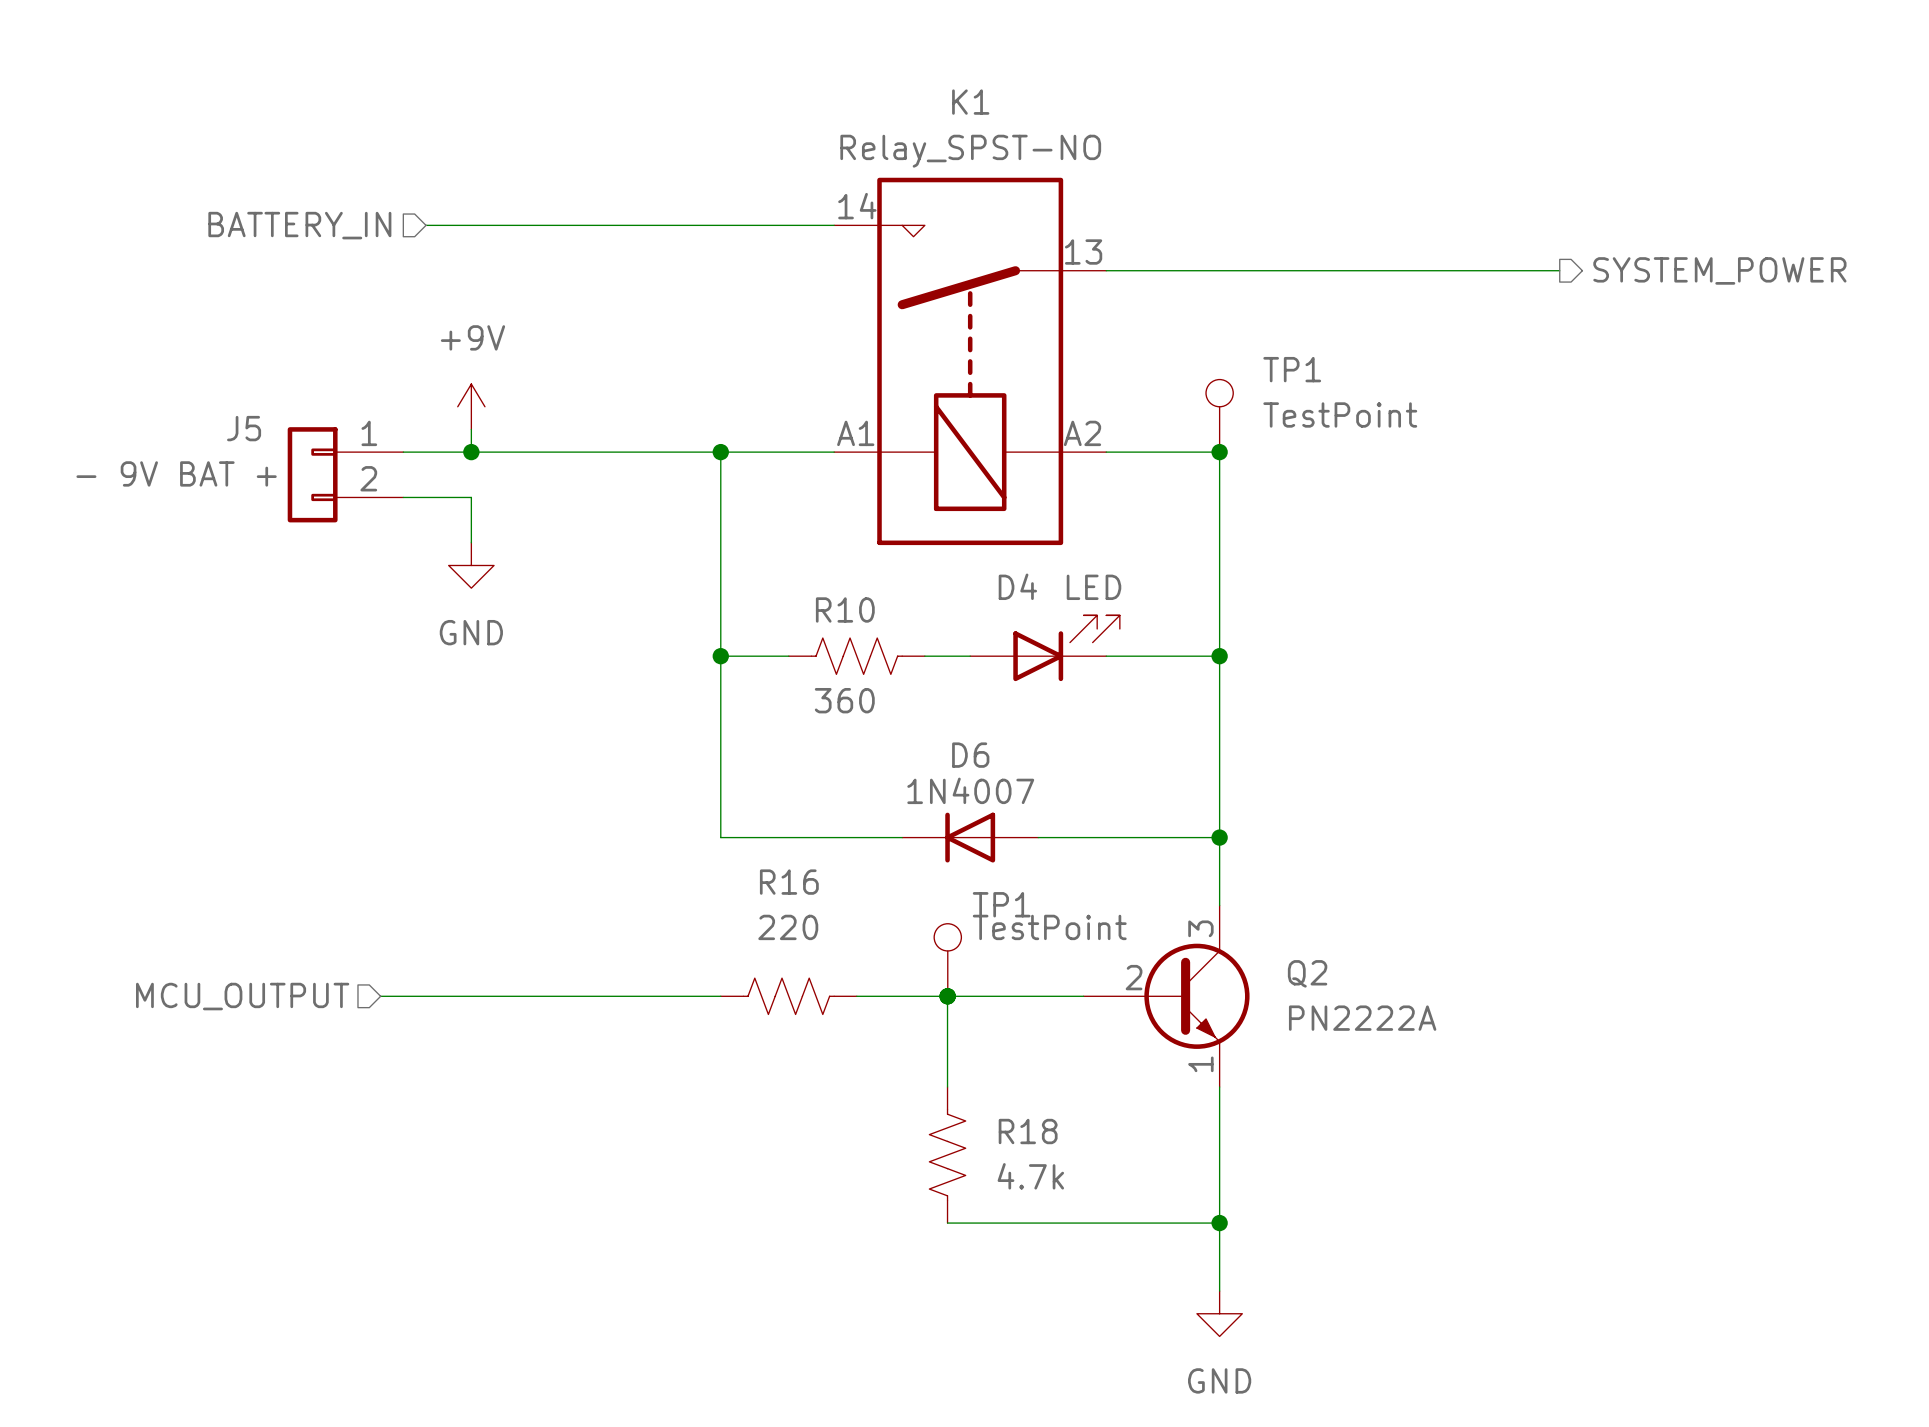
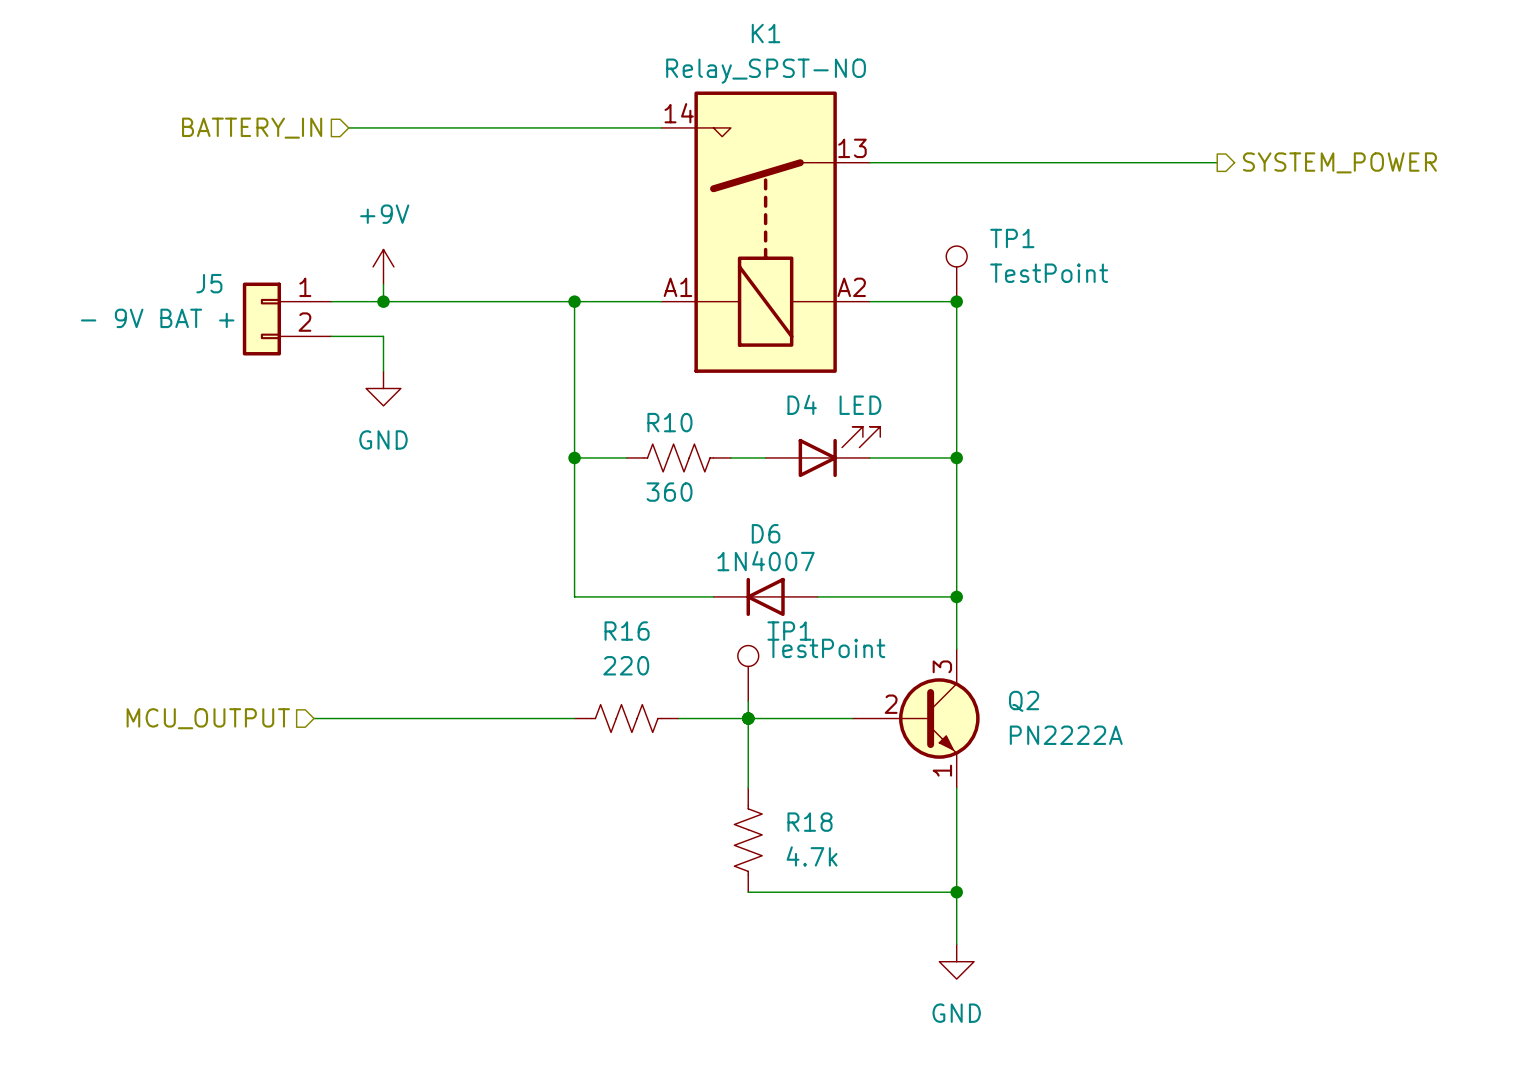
TP1 position: (947, 960) -> (748, 673)

